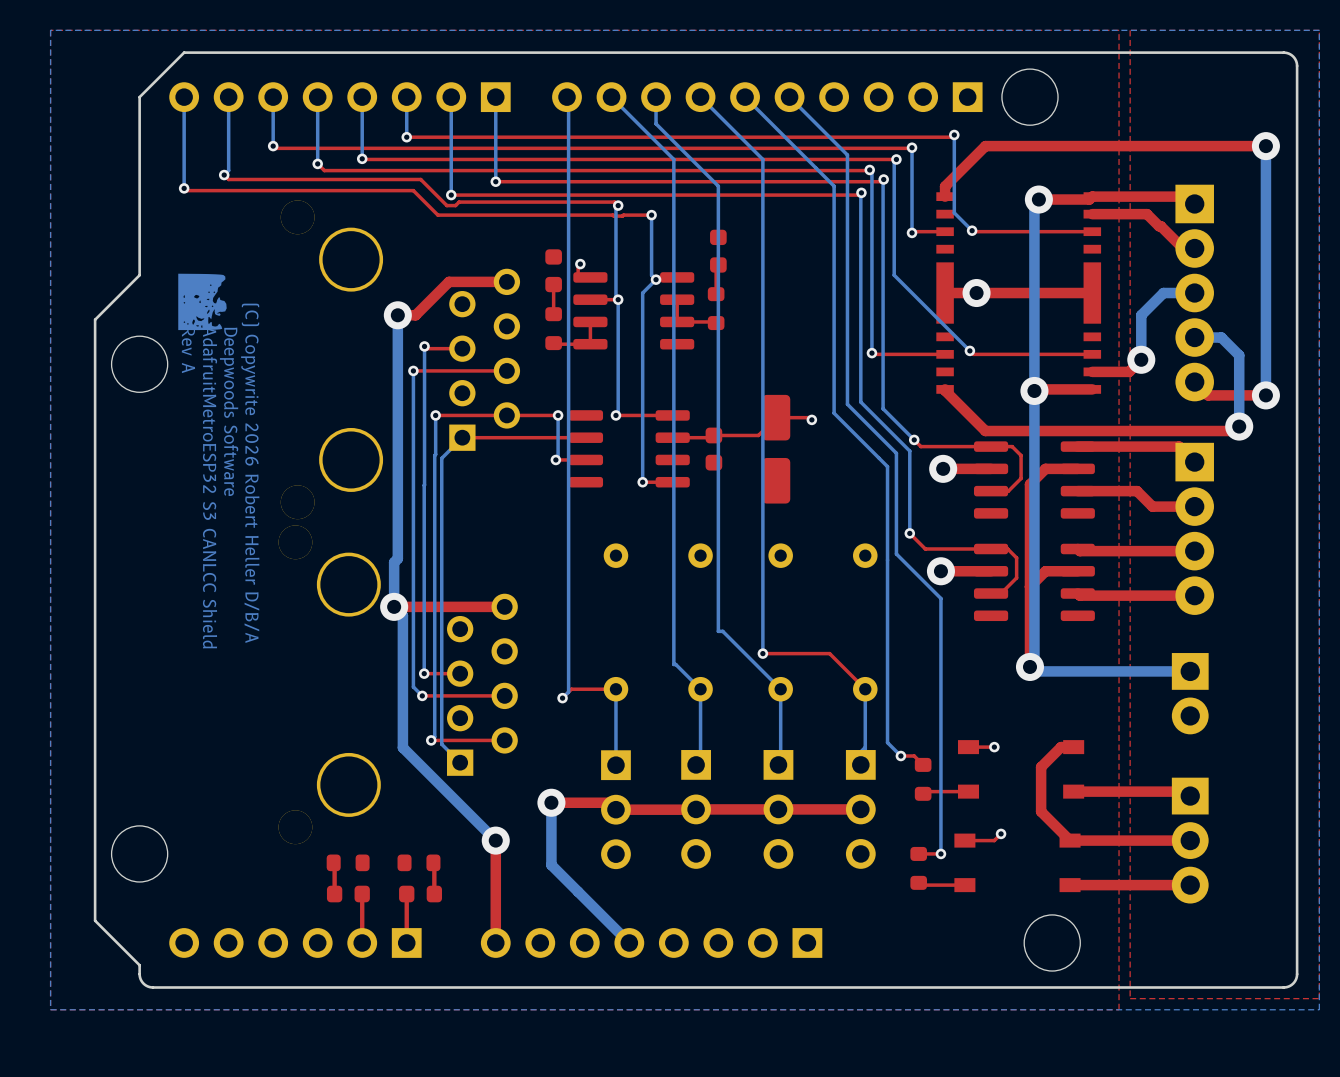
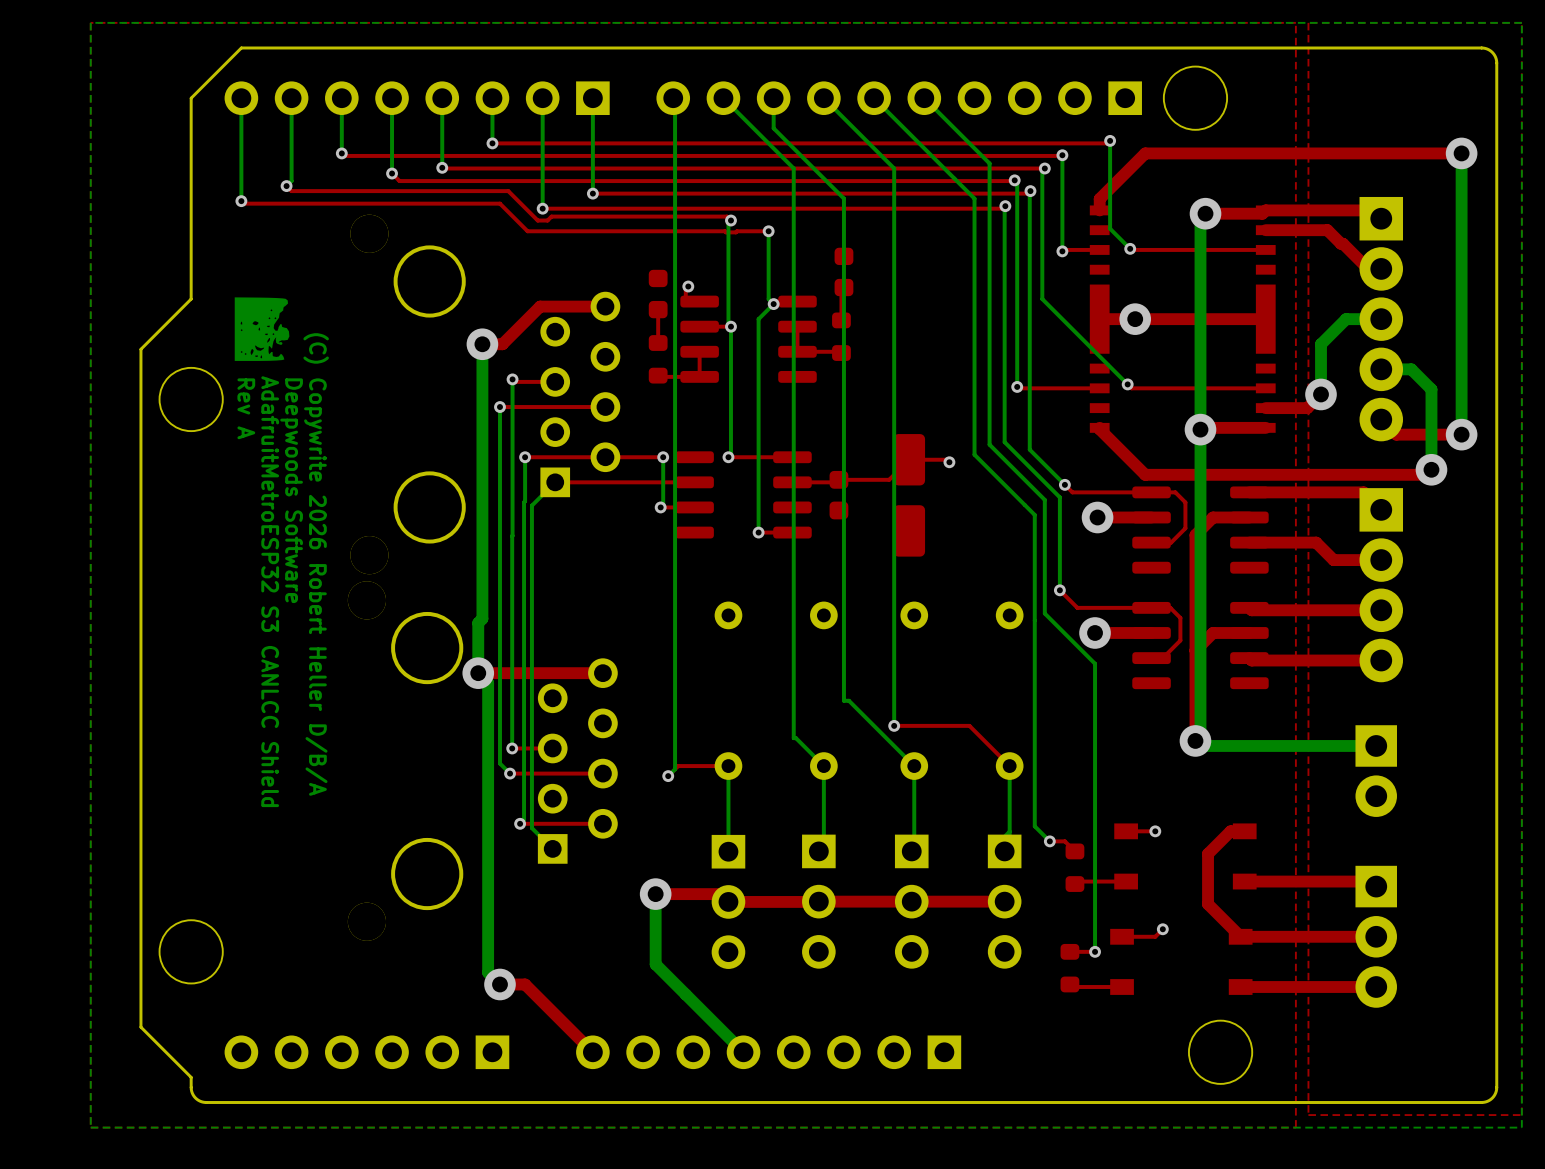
bottom track: (402, 747) (495, 840) -> (488, 832) (488, 972) (499, 984)
top track: (495, 840) (495, 942) -> (499, 984) (525, 984) (592, 1052)
via position: (495, 840) -> (499, 984)
top track: (333, 862) (334, 894) -> none
part: (348, 862) -> none
part: (418, 862) -> none
top track: (433, 862) (434, 894) -> none
part: (348, 894) -> none
top track: (362, 894) (362, 942) -> none
top track: (406, 894) (406, 942) -> none
part: (420, 894) -> none

